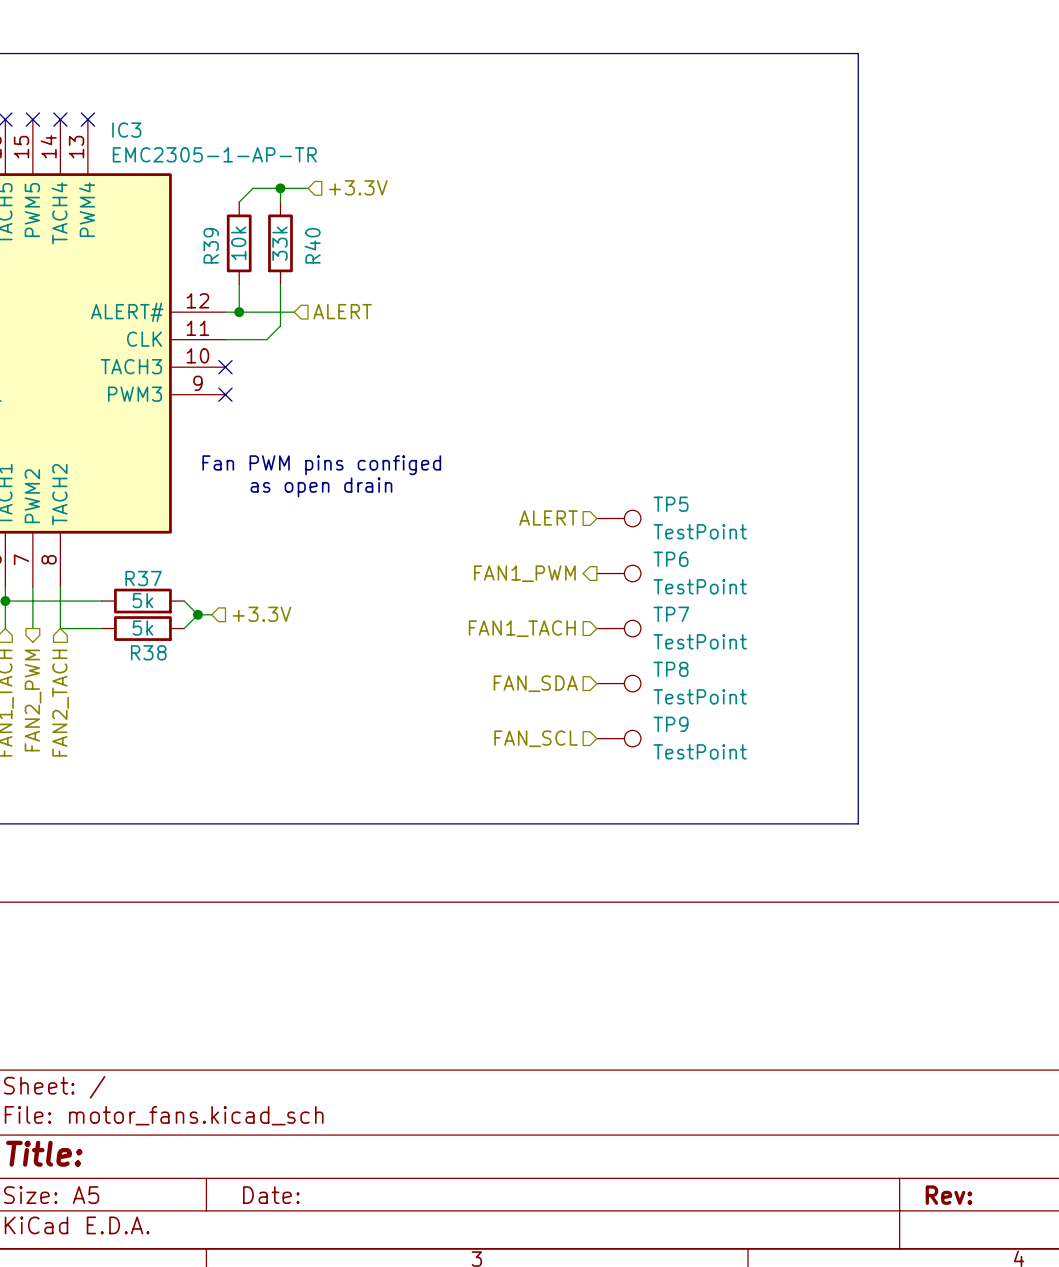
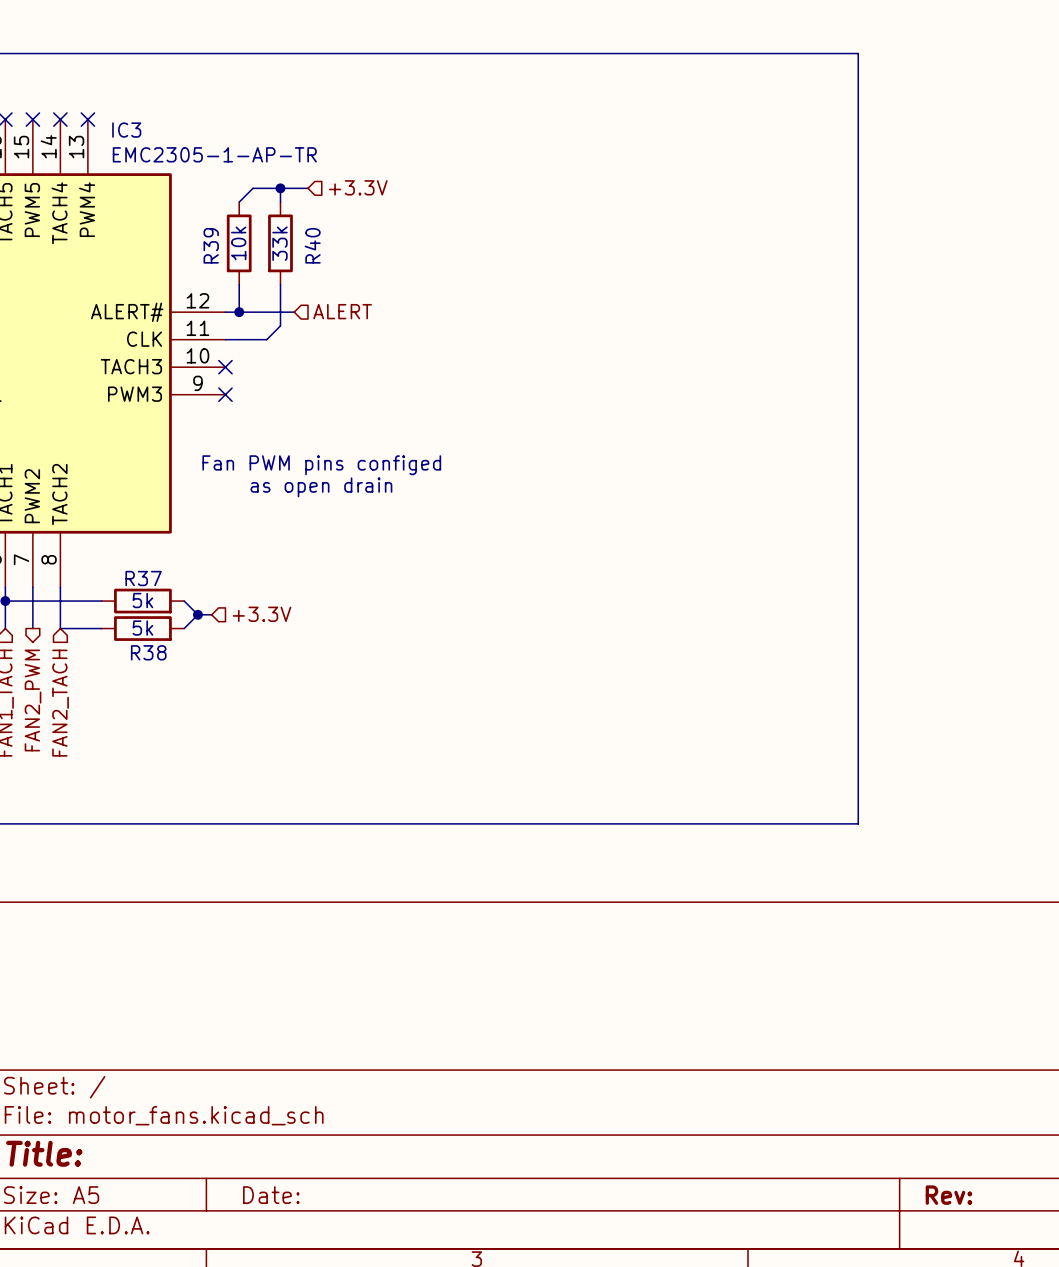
hierarchical label: ALERT (548, 517) -> none
TP5: TestPoint (618, 518) -> none
hierarchical label: FAN1_PWM (524, 573) -> none
TP6: TestPoint (618, 573) -> none
hierarchical label: FAN1_TACH (522, 628) -> none
TP7: TestPoint (618, 628) -> none
hierarchical label: FAN_SDA (535, 683) -> none
TP8: TestPoint (618, 683) -> none
hierarchical label: FAN_SCL (536, 738) -> none
TP9: TestPoint (618, 738) -> none

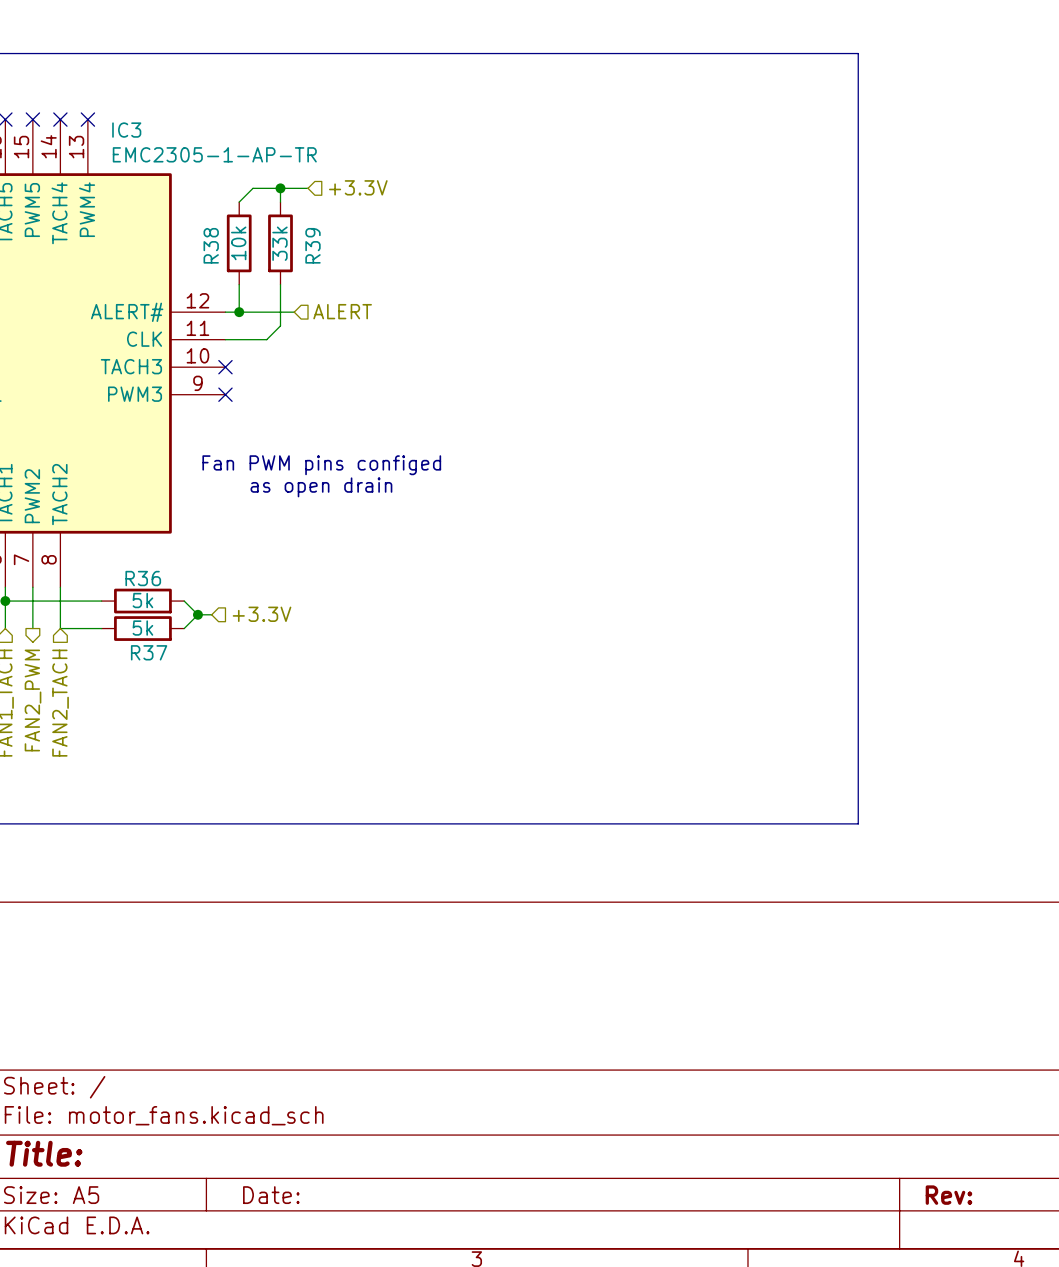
R39 name: R39 (211, 245) -> R38 (211, 245)
R40 name: R40 (312, 245) -> R39 (312, 245)
R37 name: R37 (143, 578) -> R36 (143, 578)
R38 name: R38 (148, 652) -> R37 (149, 652)

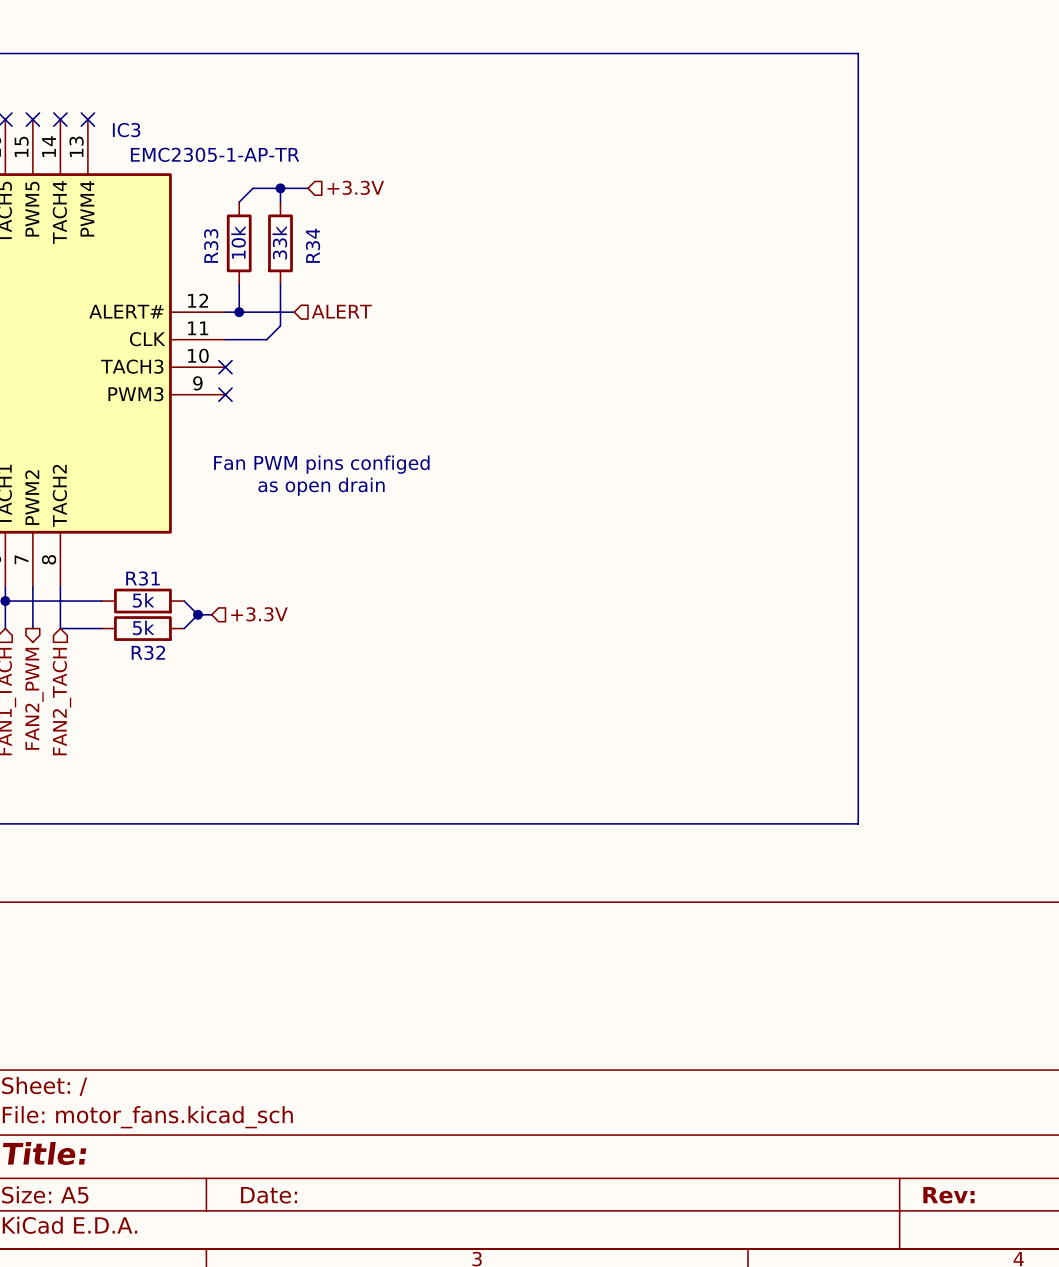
R38 name: R38 (211, 245) -> R33 (211, 245)
R39 name: R39 (312, 245) -> R34 (313, 245)
R36 name: R36 (143, 578) -> R31 (142, 578)
R37 name: R37 (149, 652) -> R32 (148, 652)

